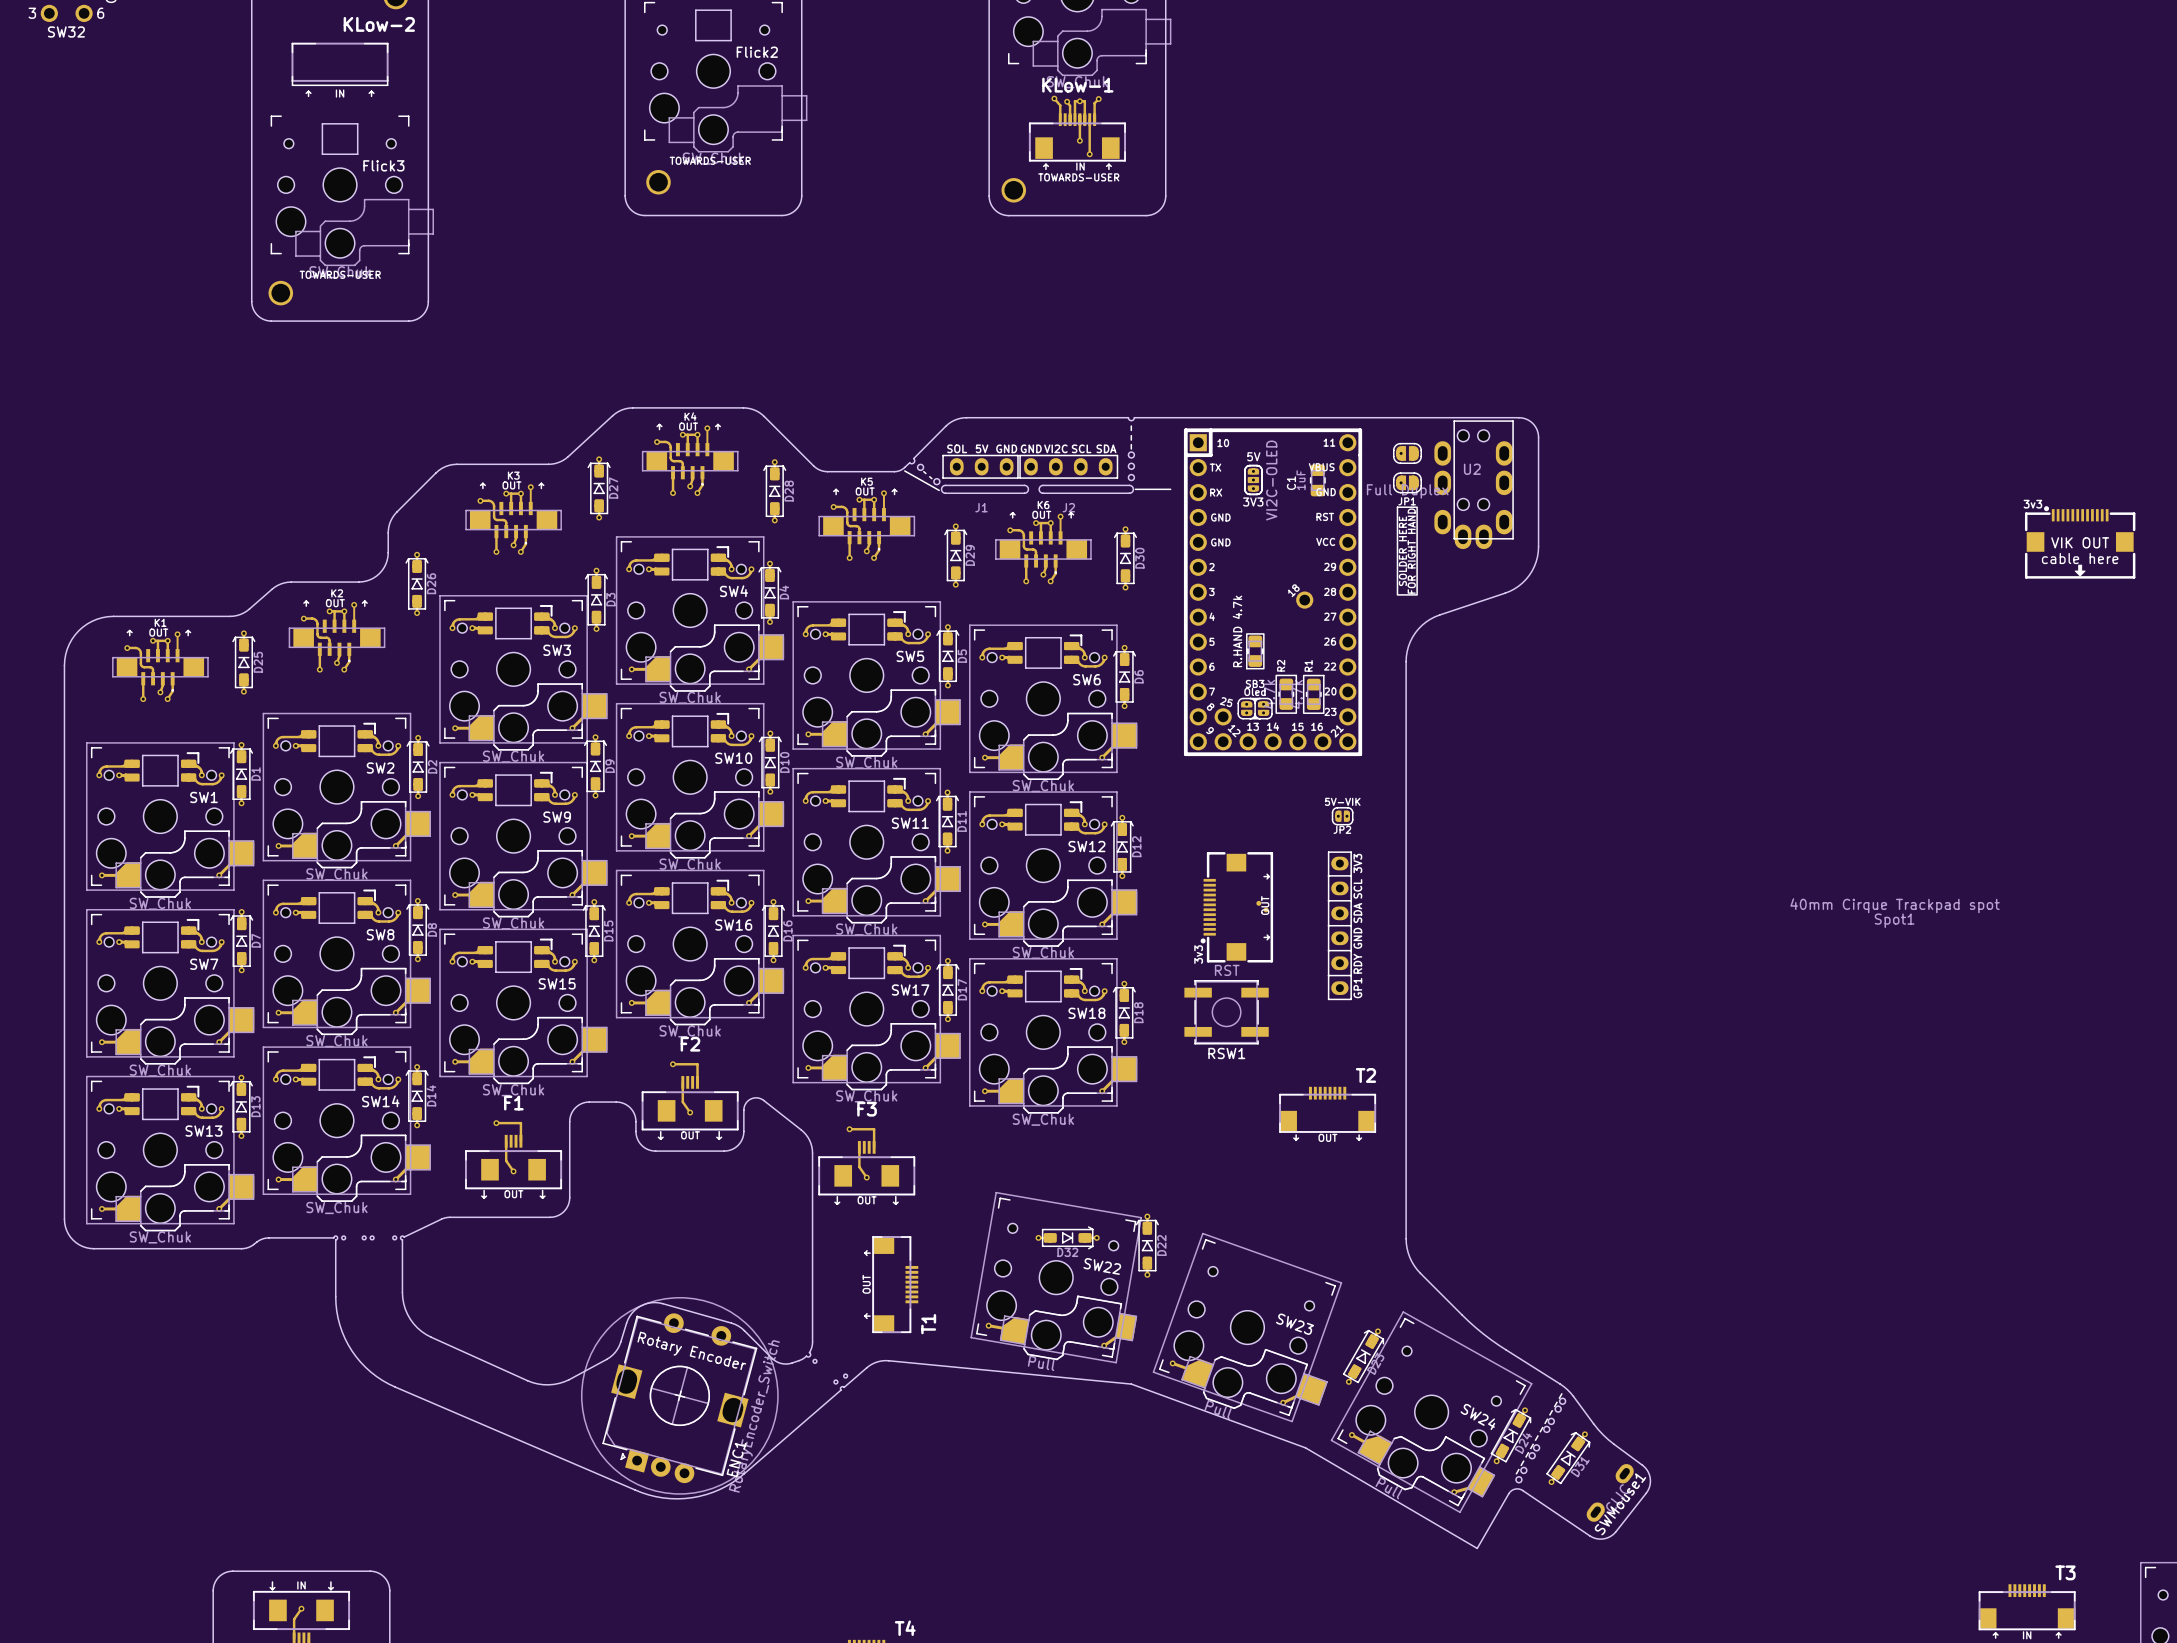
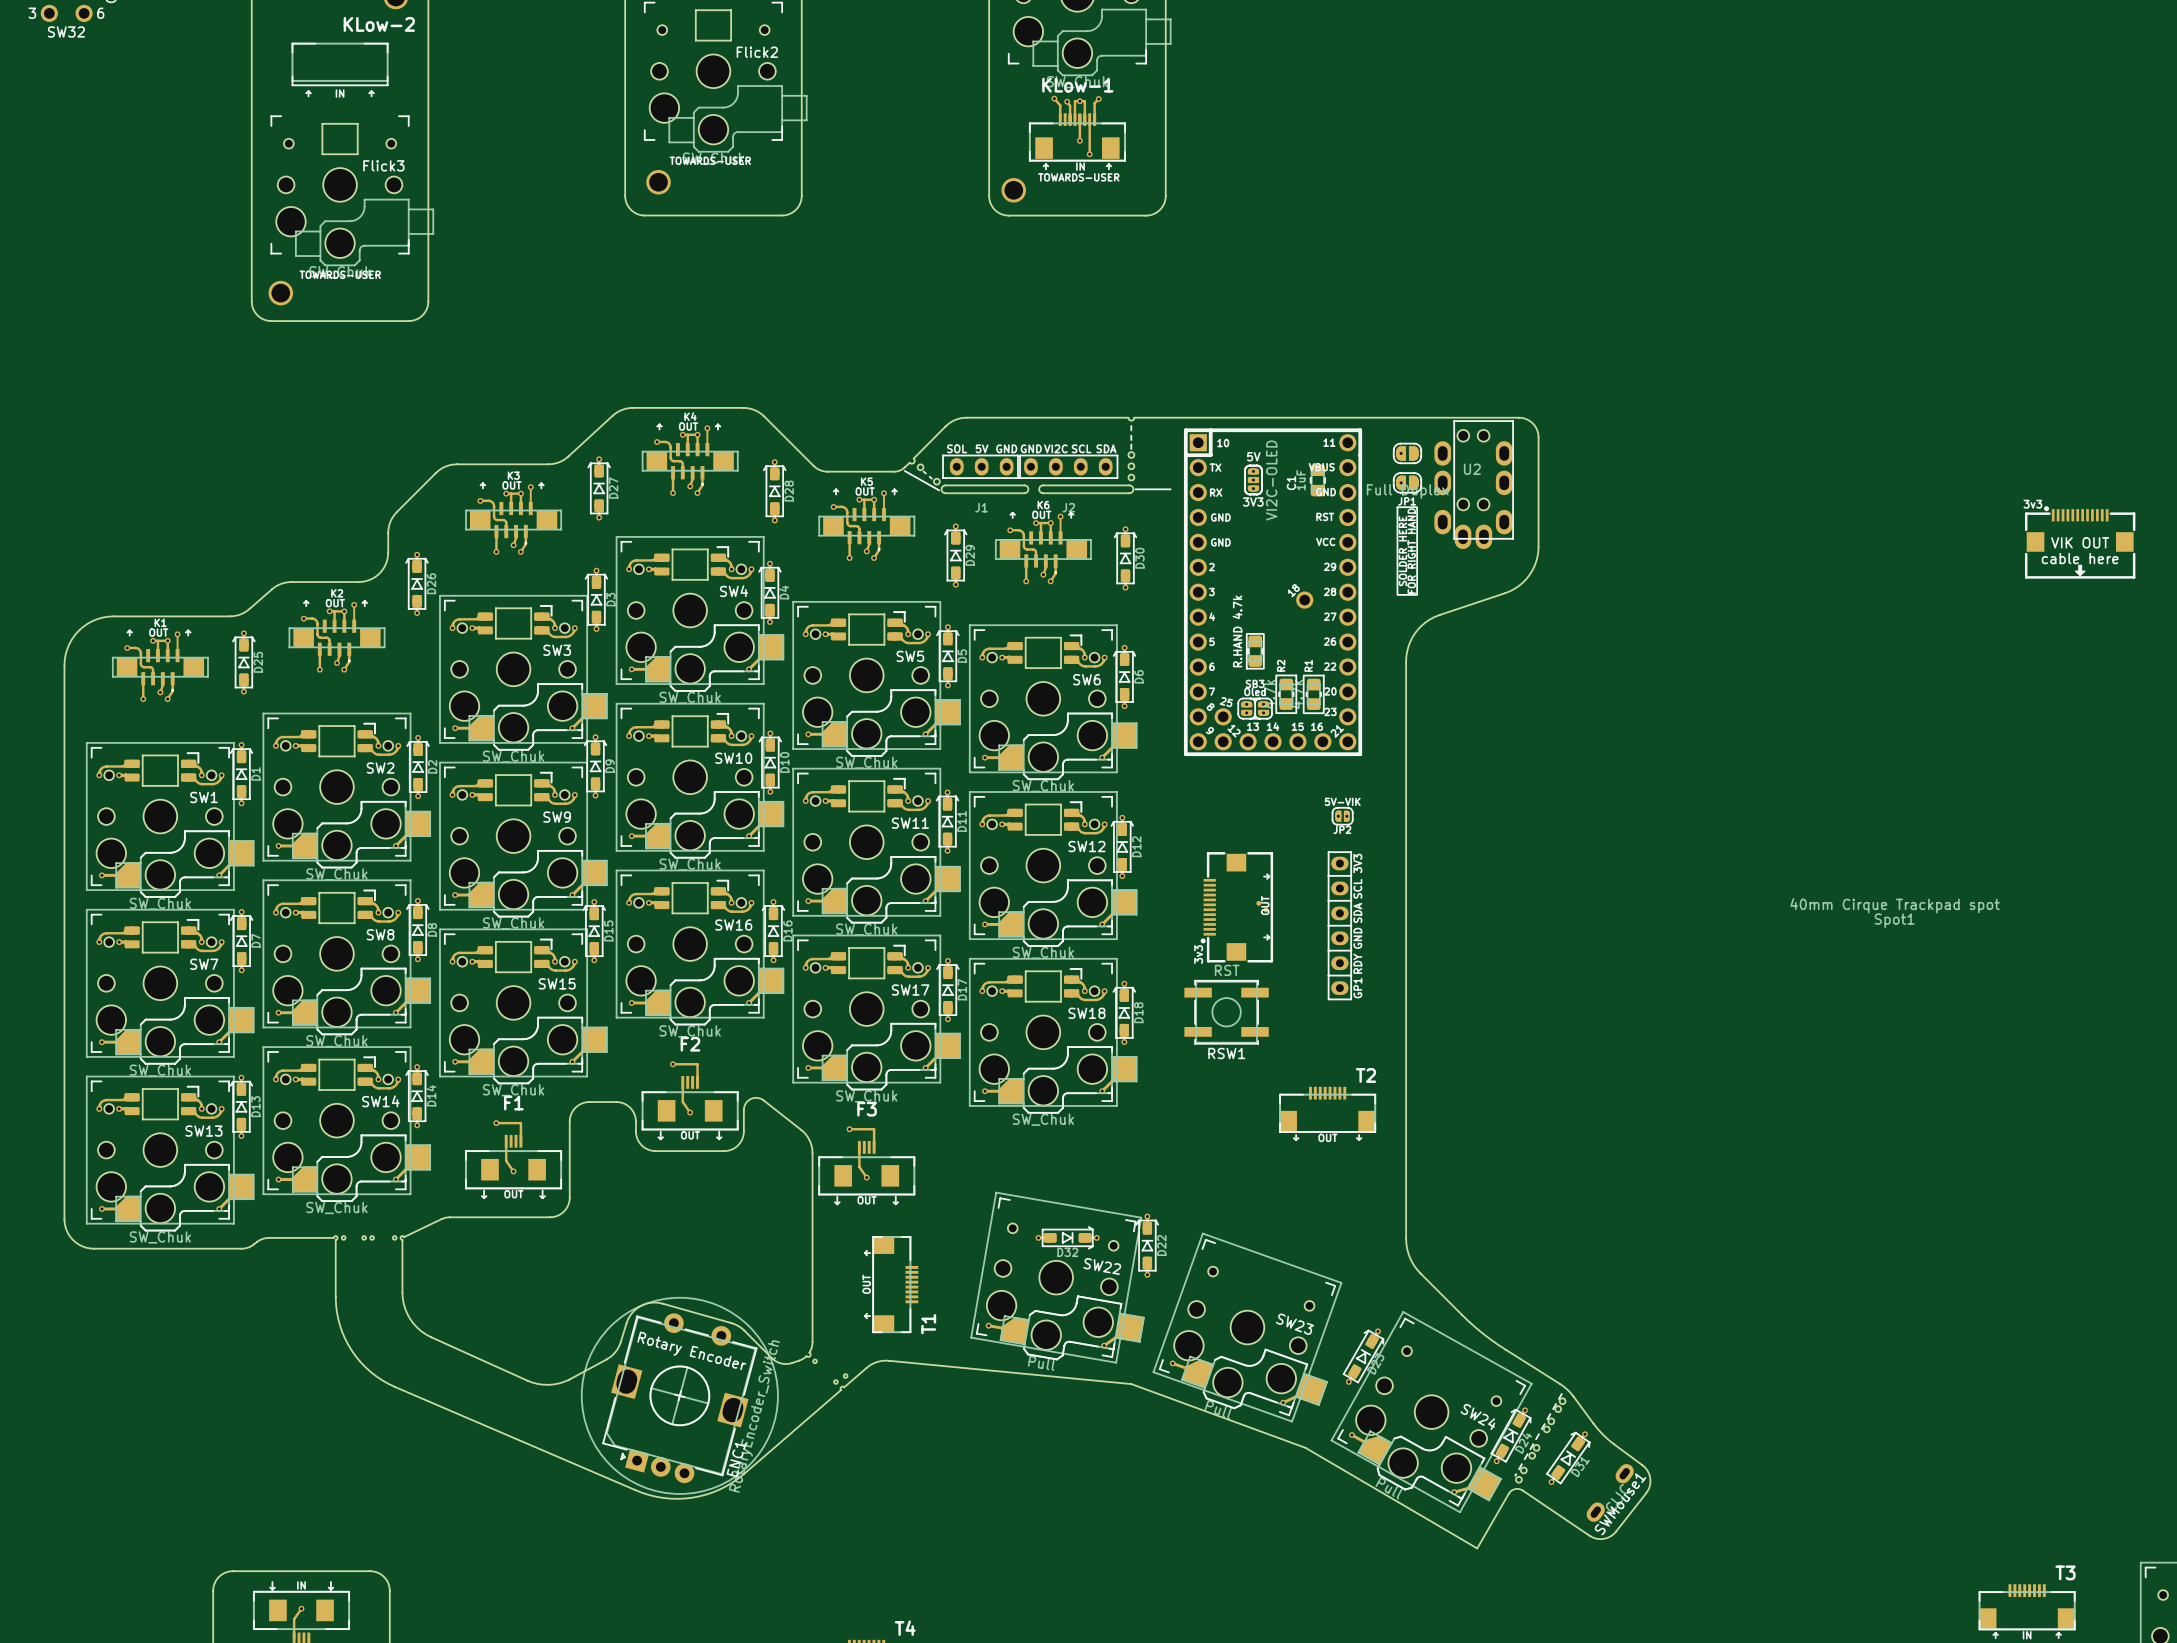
SW22 footprint: [970, 1191, 1142, 1364] -> [970, 1191, 1145, 1364]
SW24 footprint: [1330, 1311, 1533, 1513] -> [1330, 1311, 1533, 1513]

